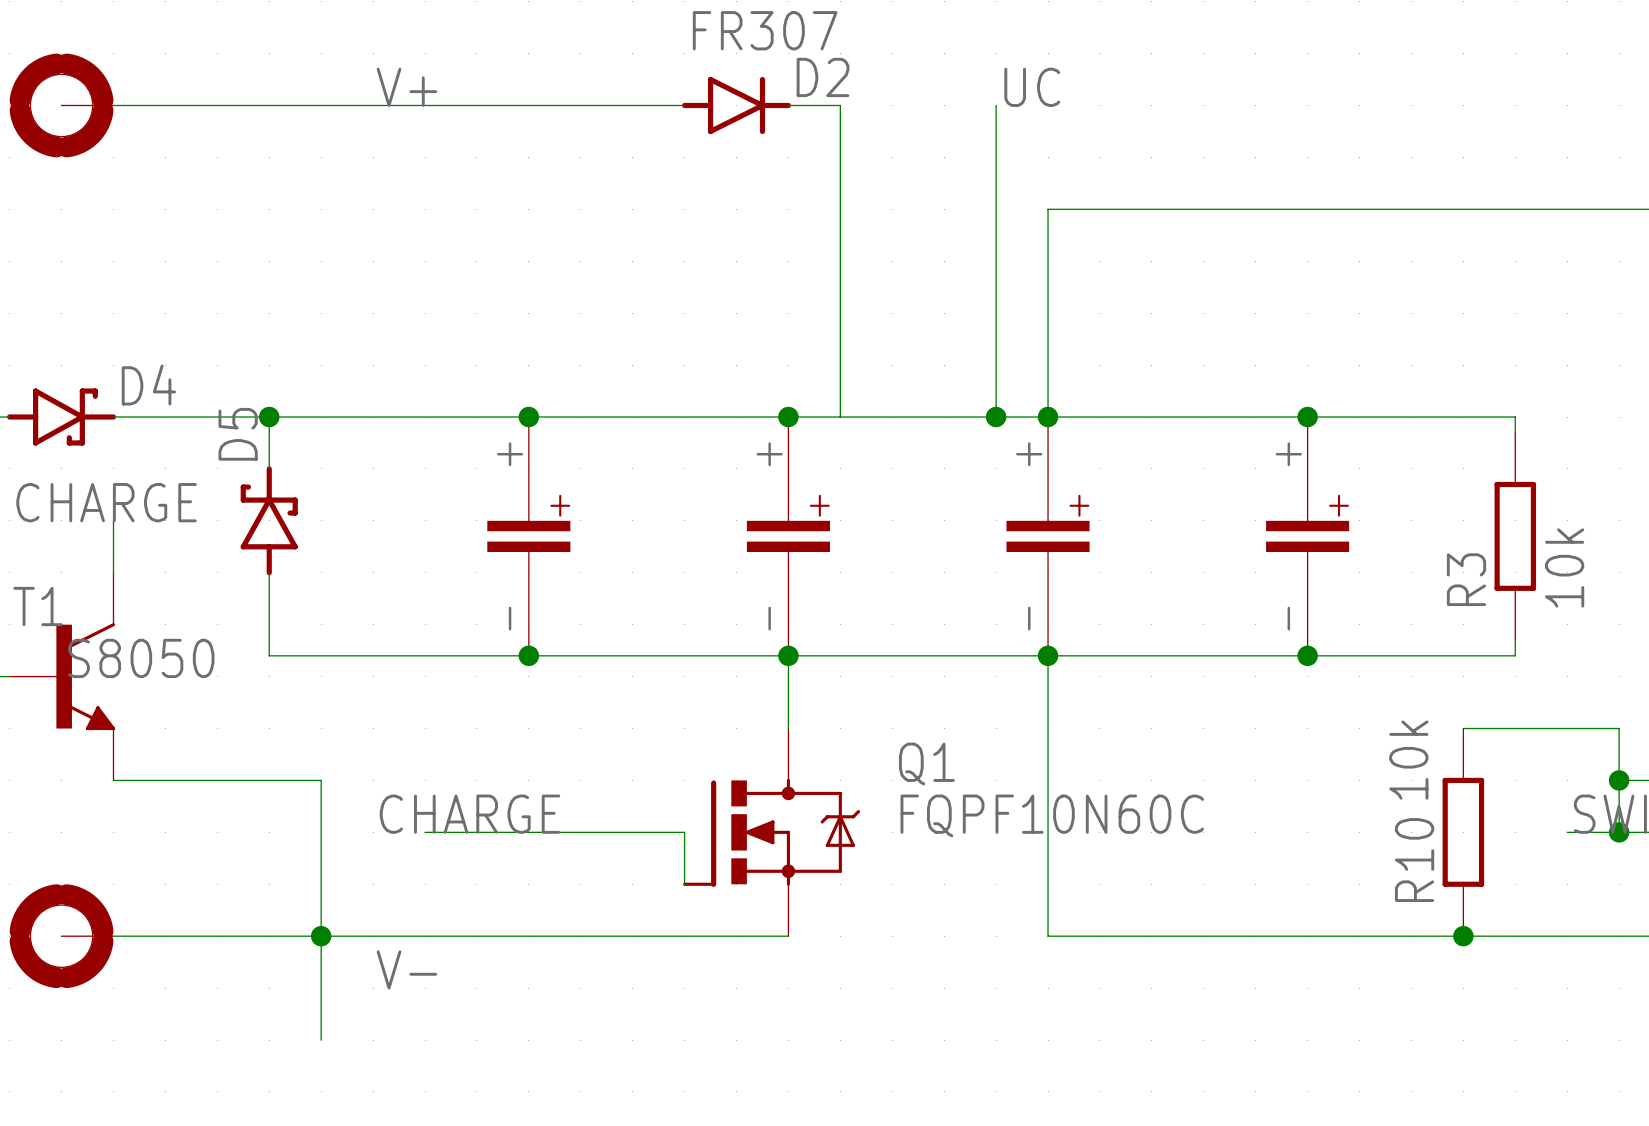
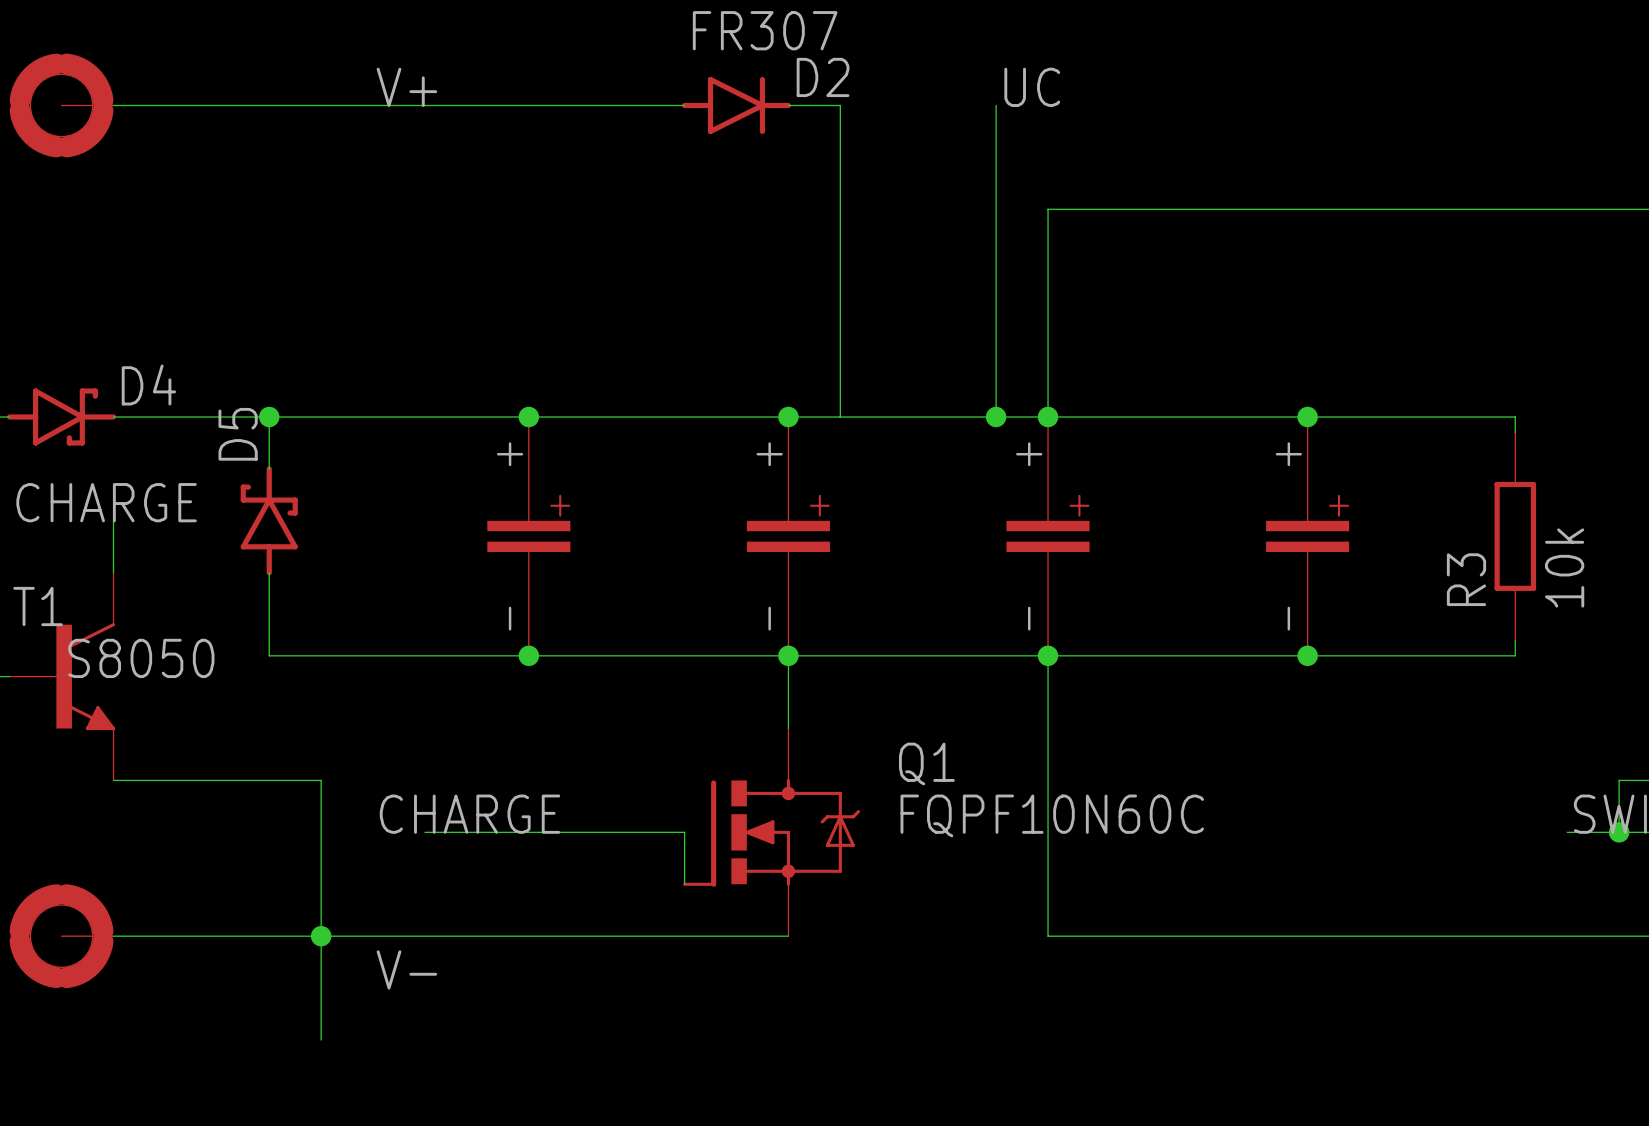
wire: (1463, 728) (1619, 728) (1619, 780) -> none
junction: (1619, 780) -> none
R10: 10k (1463, 832) -> none
junction: (1463, 936) -> none

